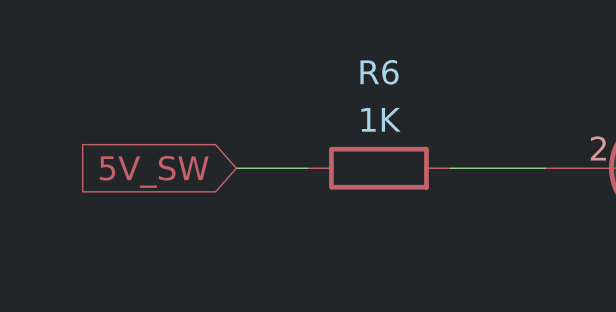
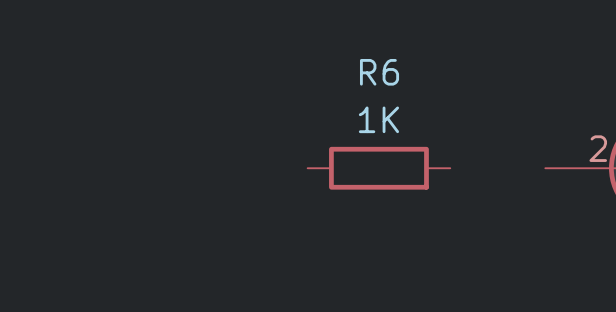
wire: (236, 168) (307, 168) -> none
wire: (450, 168) (545, 168) -> none
global label: 5V_SW (154, 171) -> none

